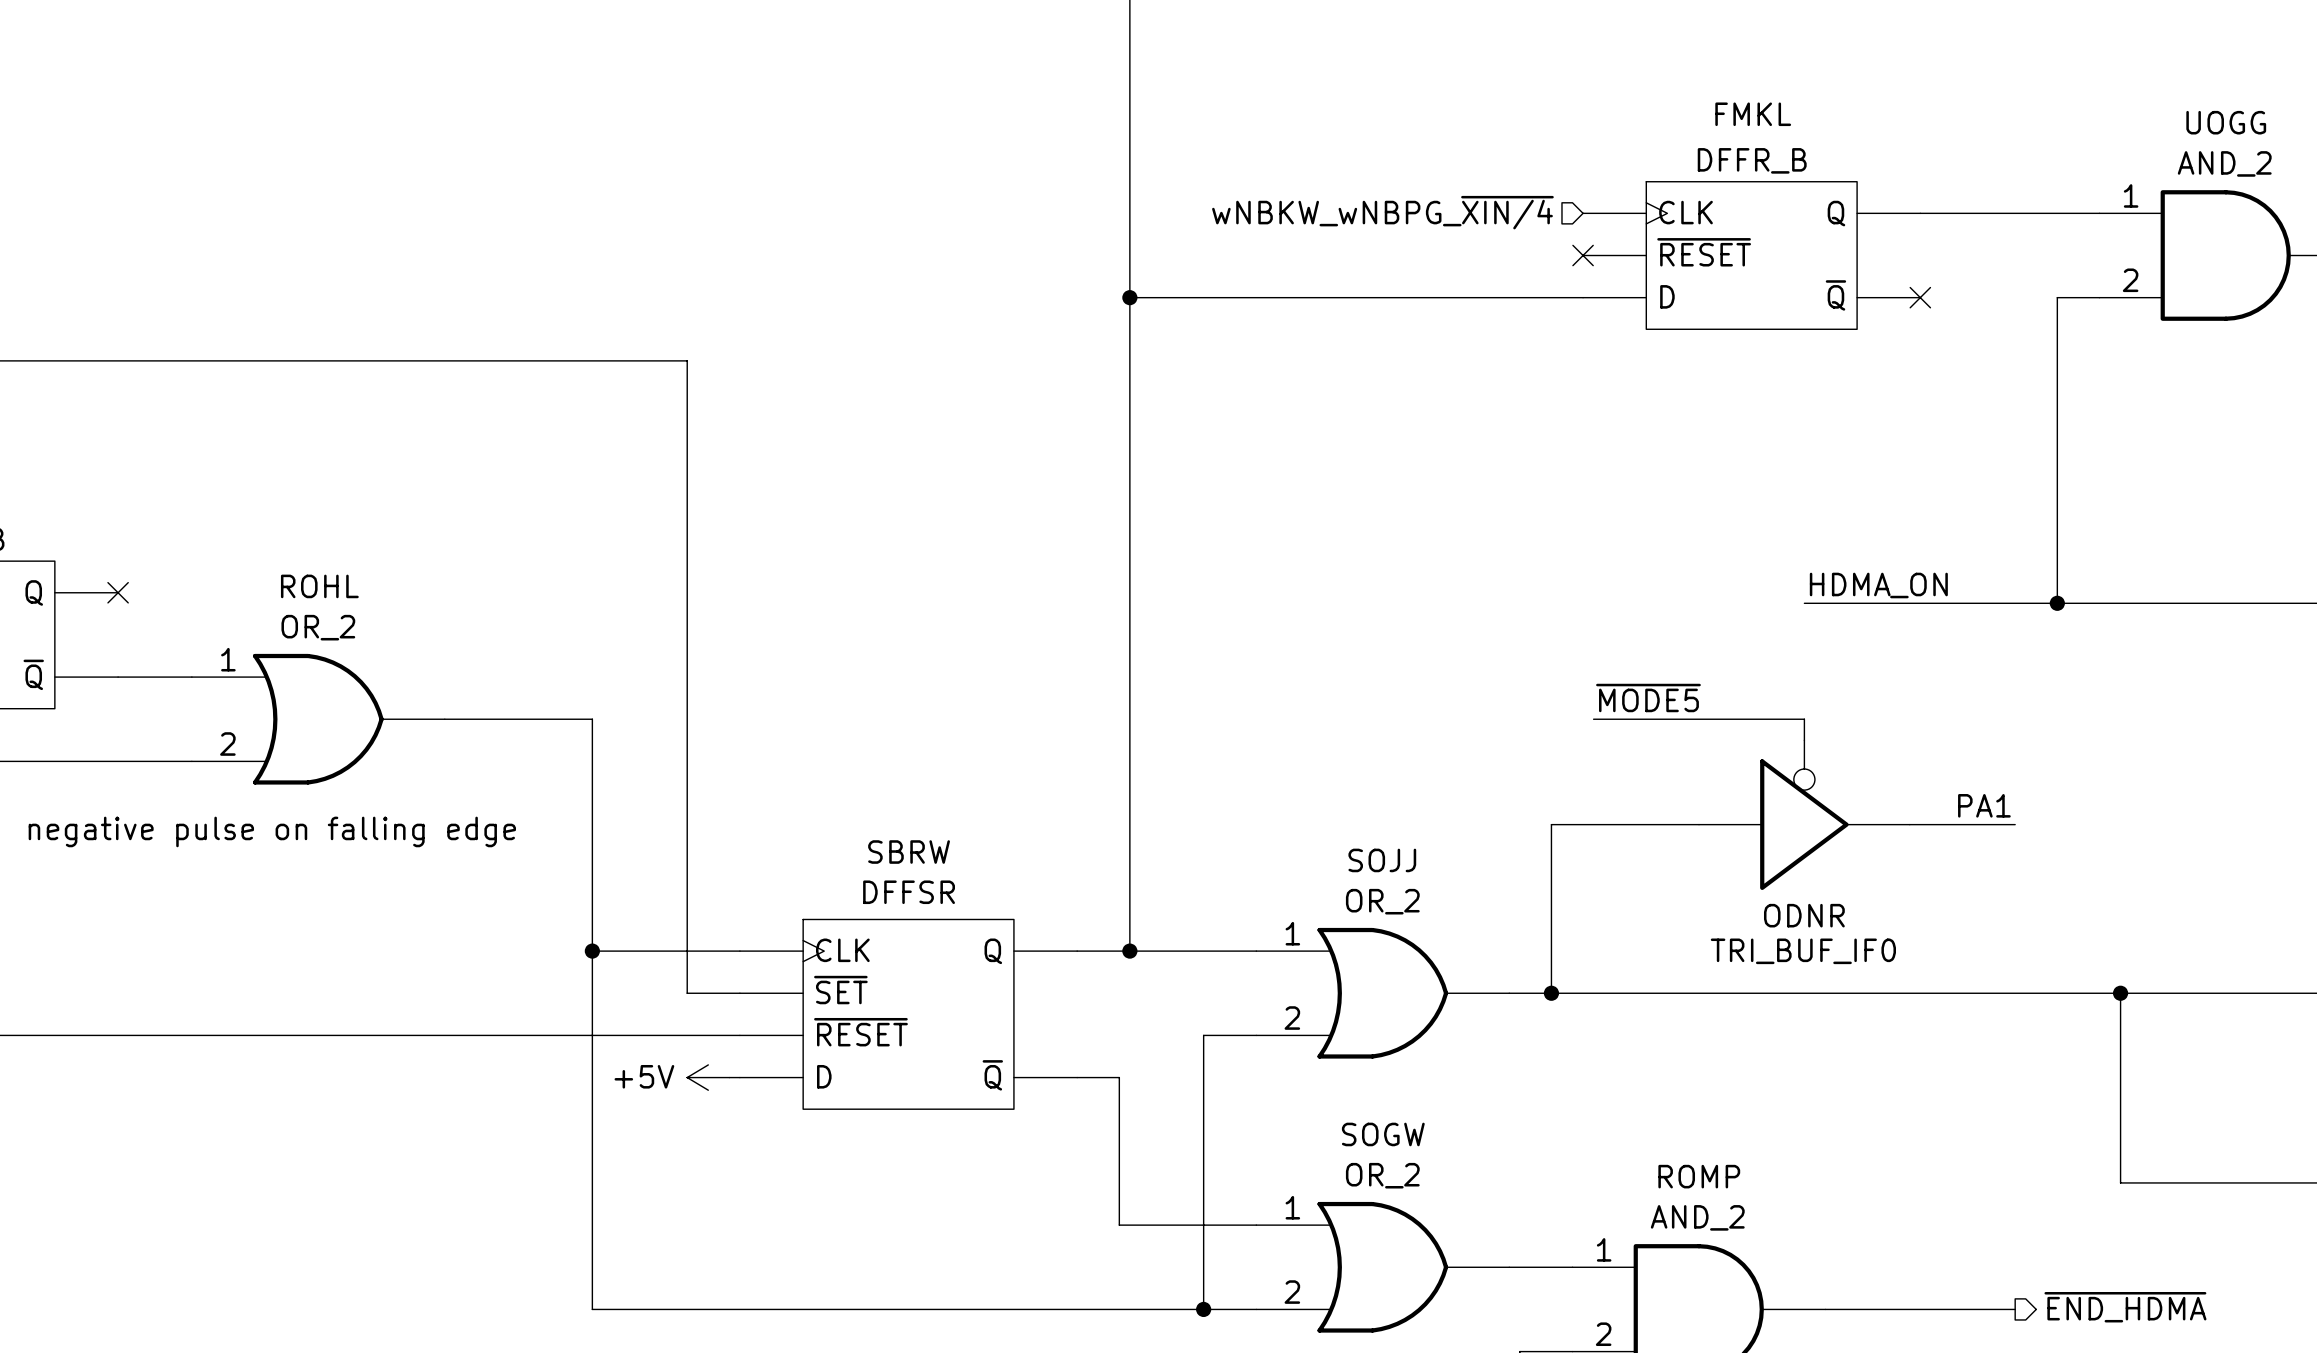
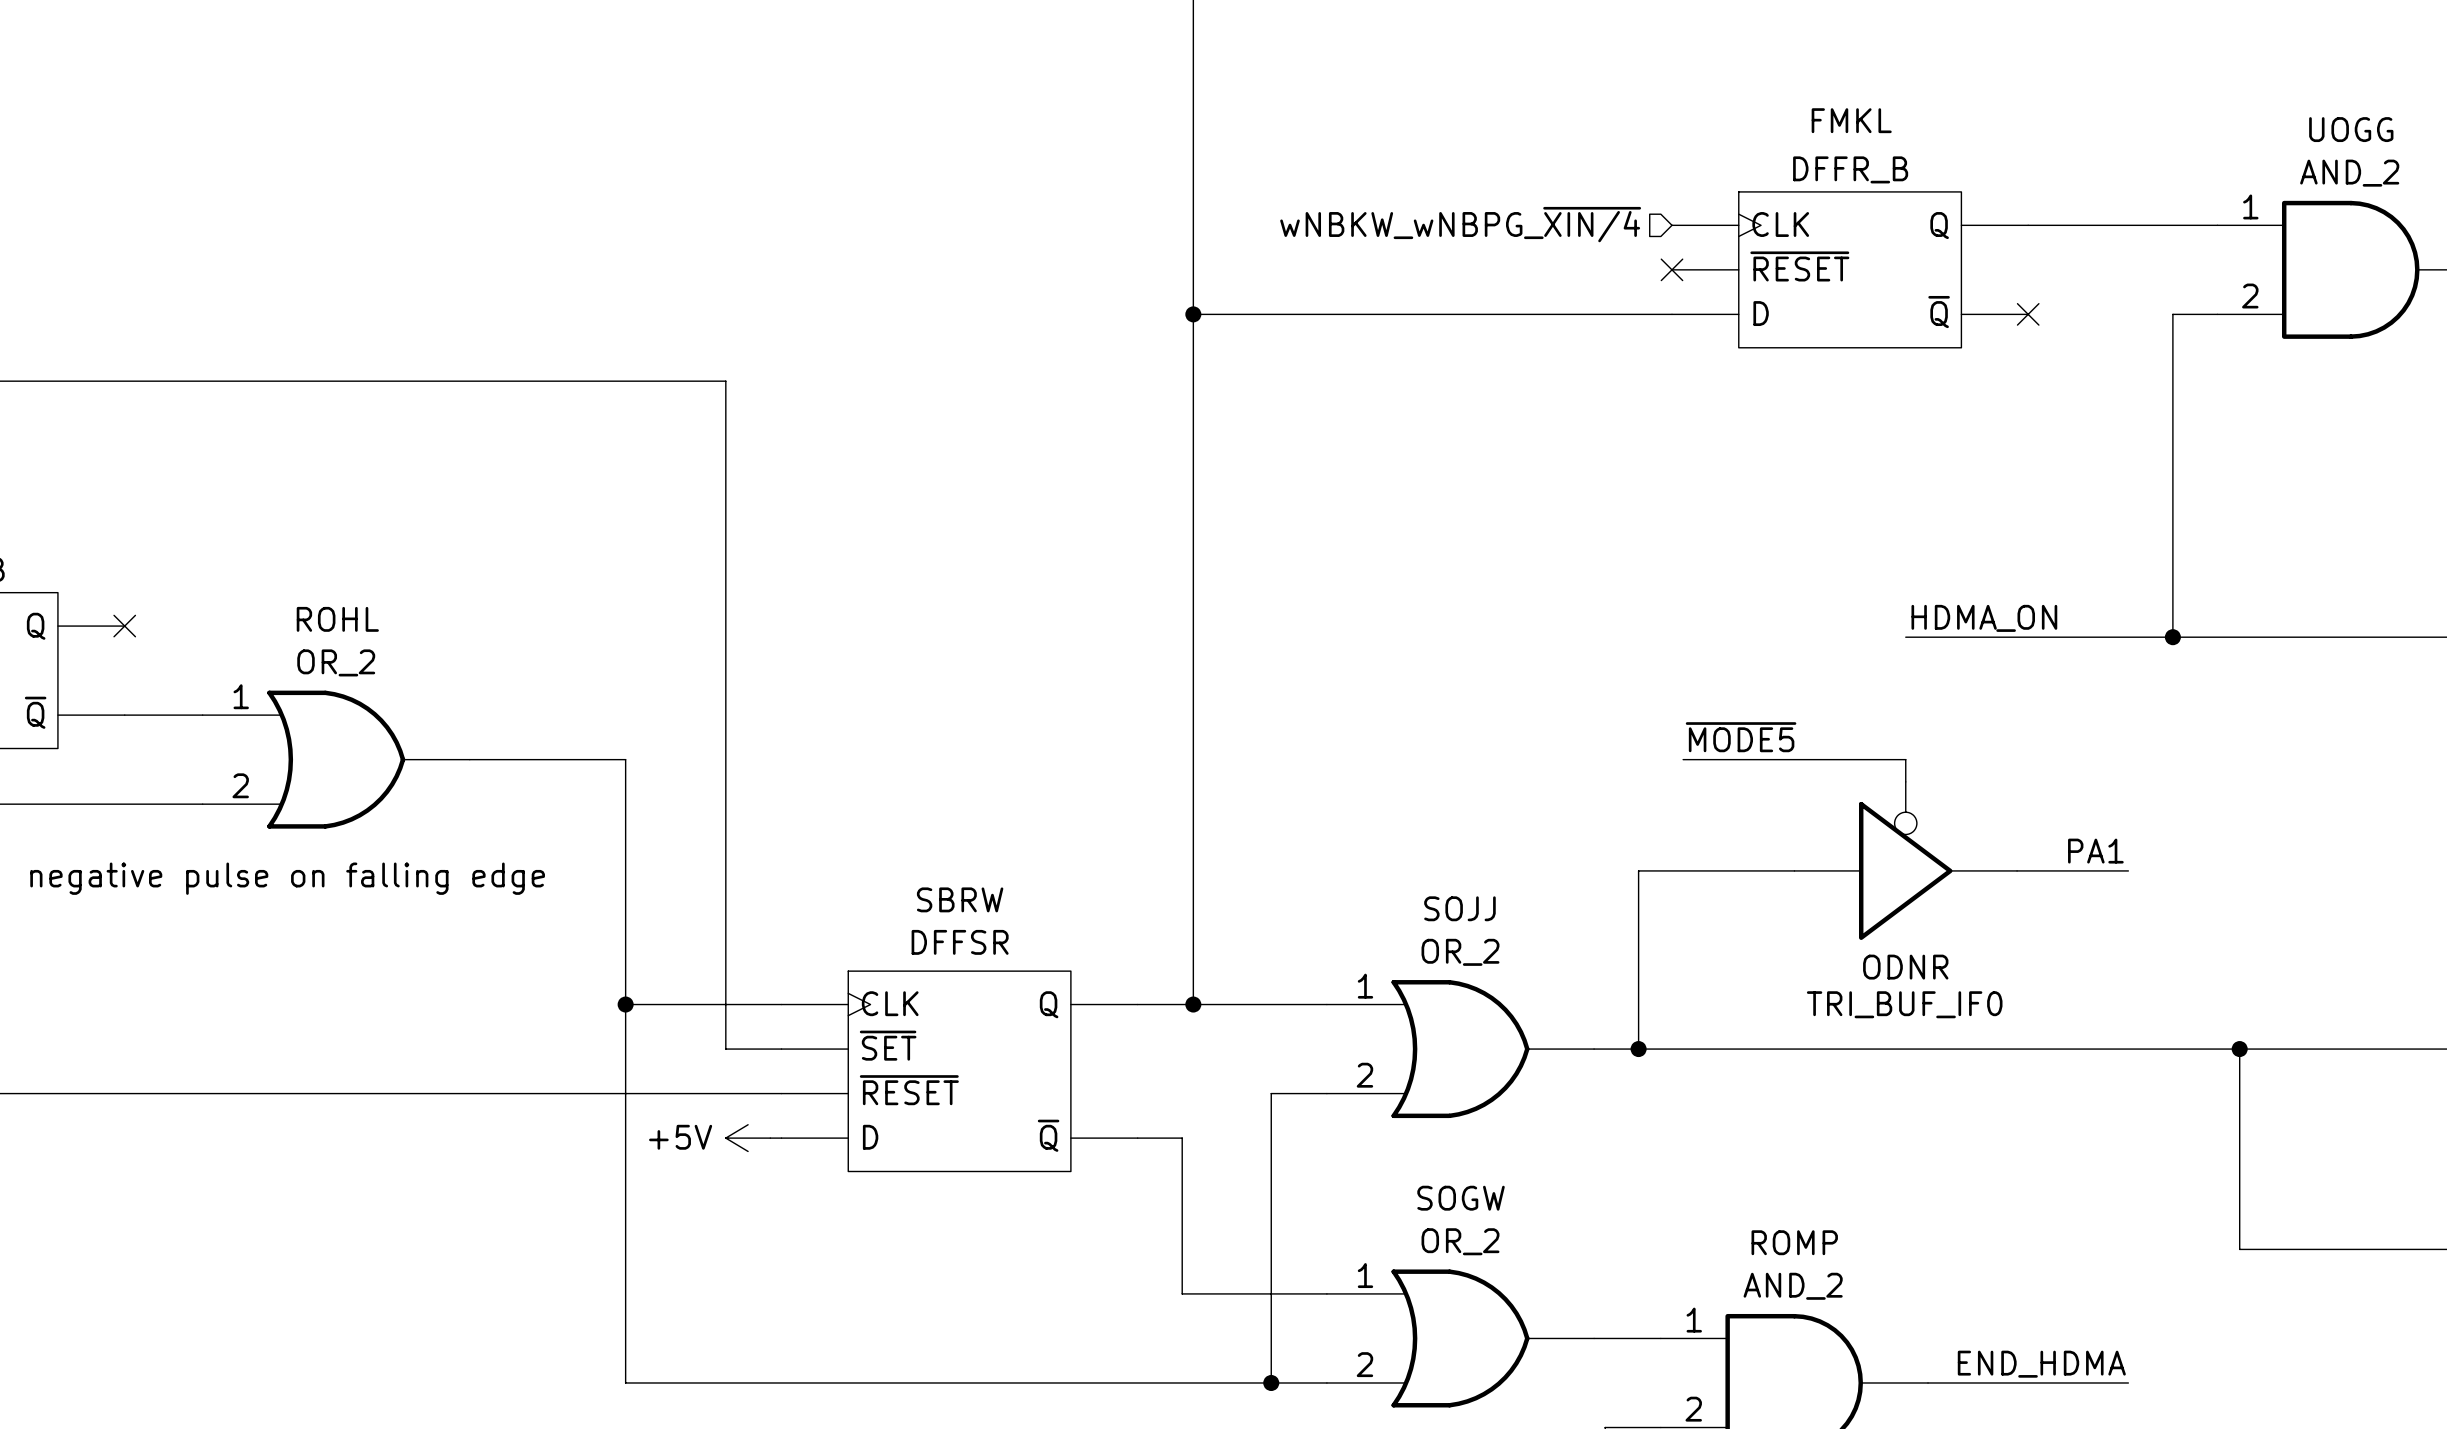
label: none -> END_HDMA (2041, 1364)
hierarchical label: ~{END_HDMA} (2125, 1307) -> none

